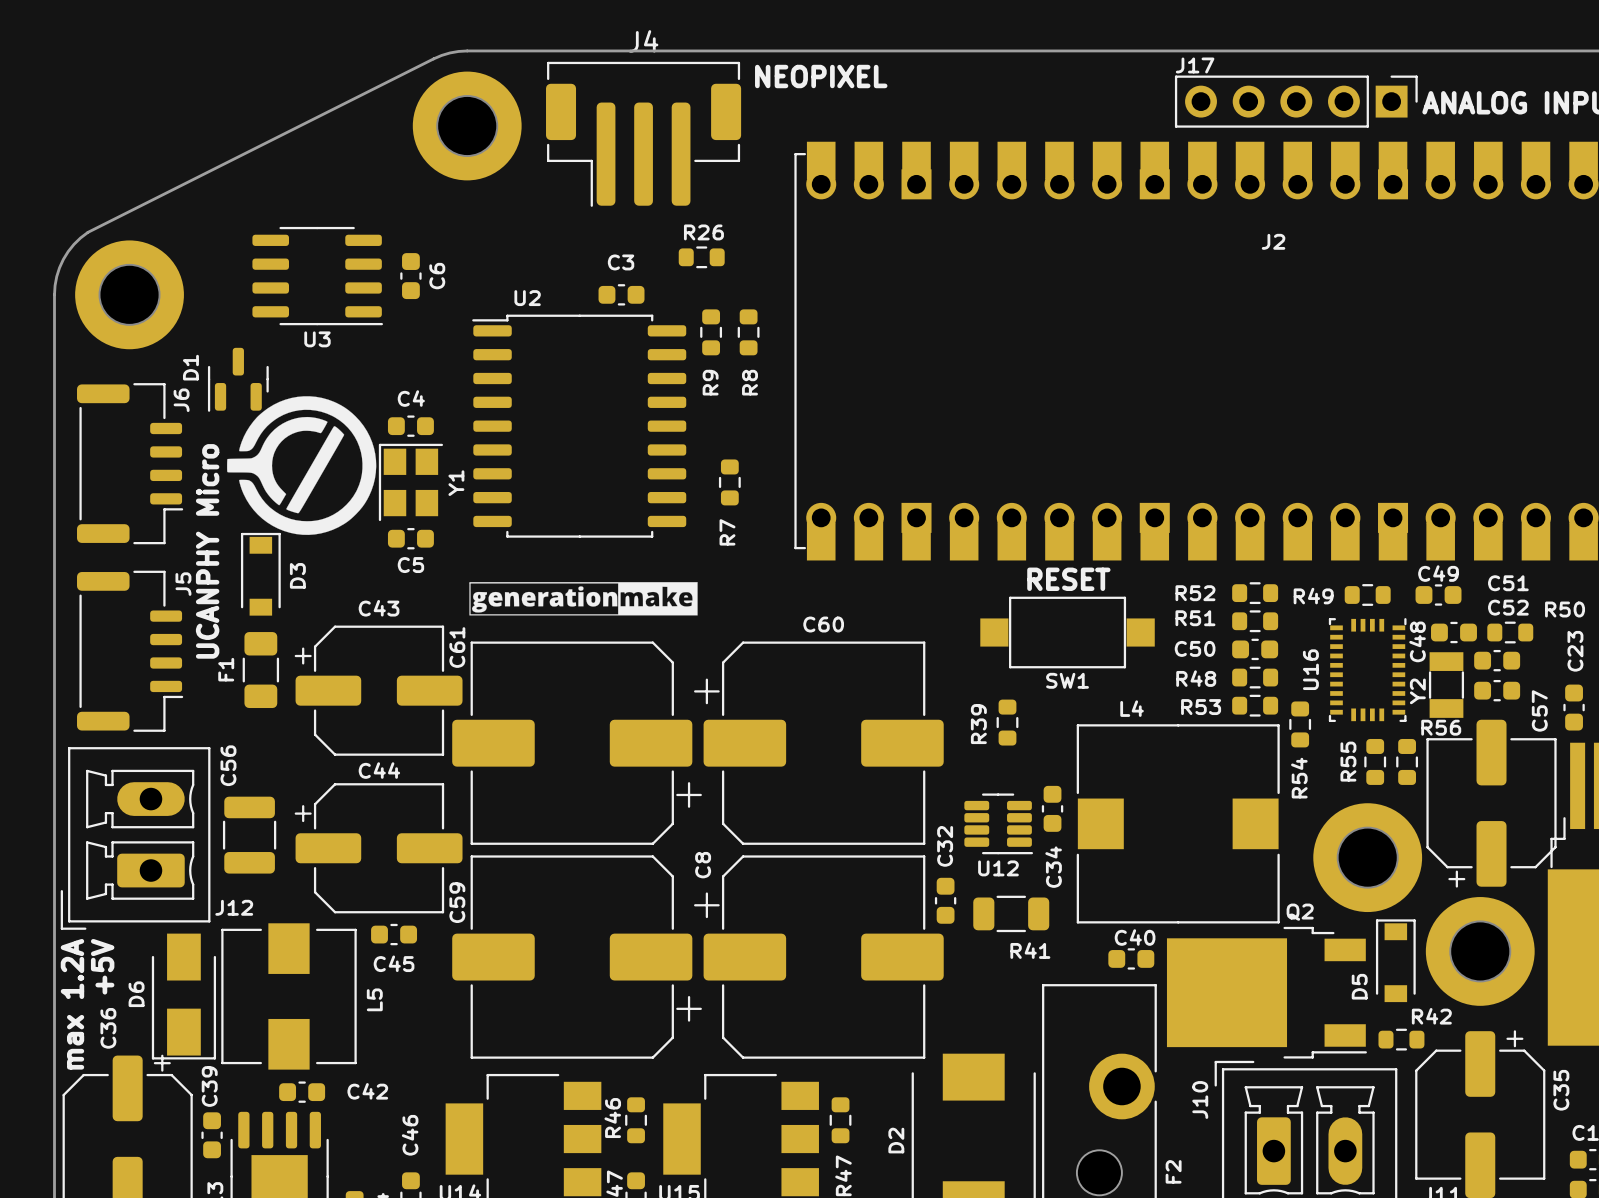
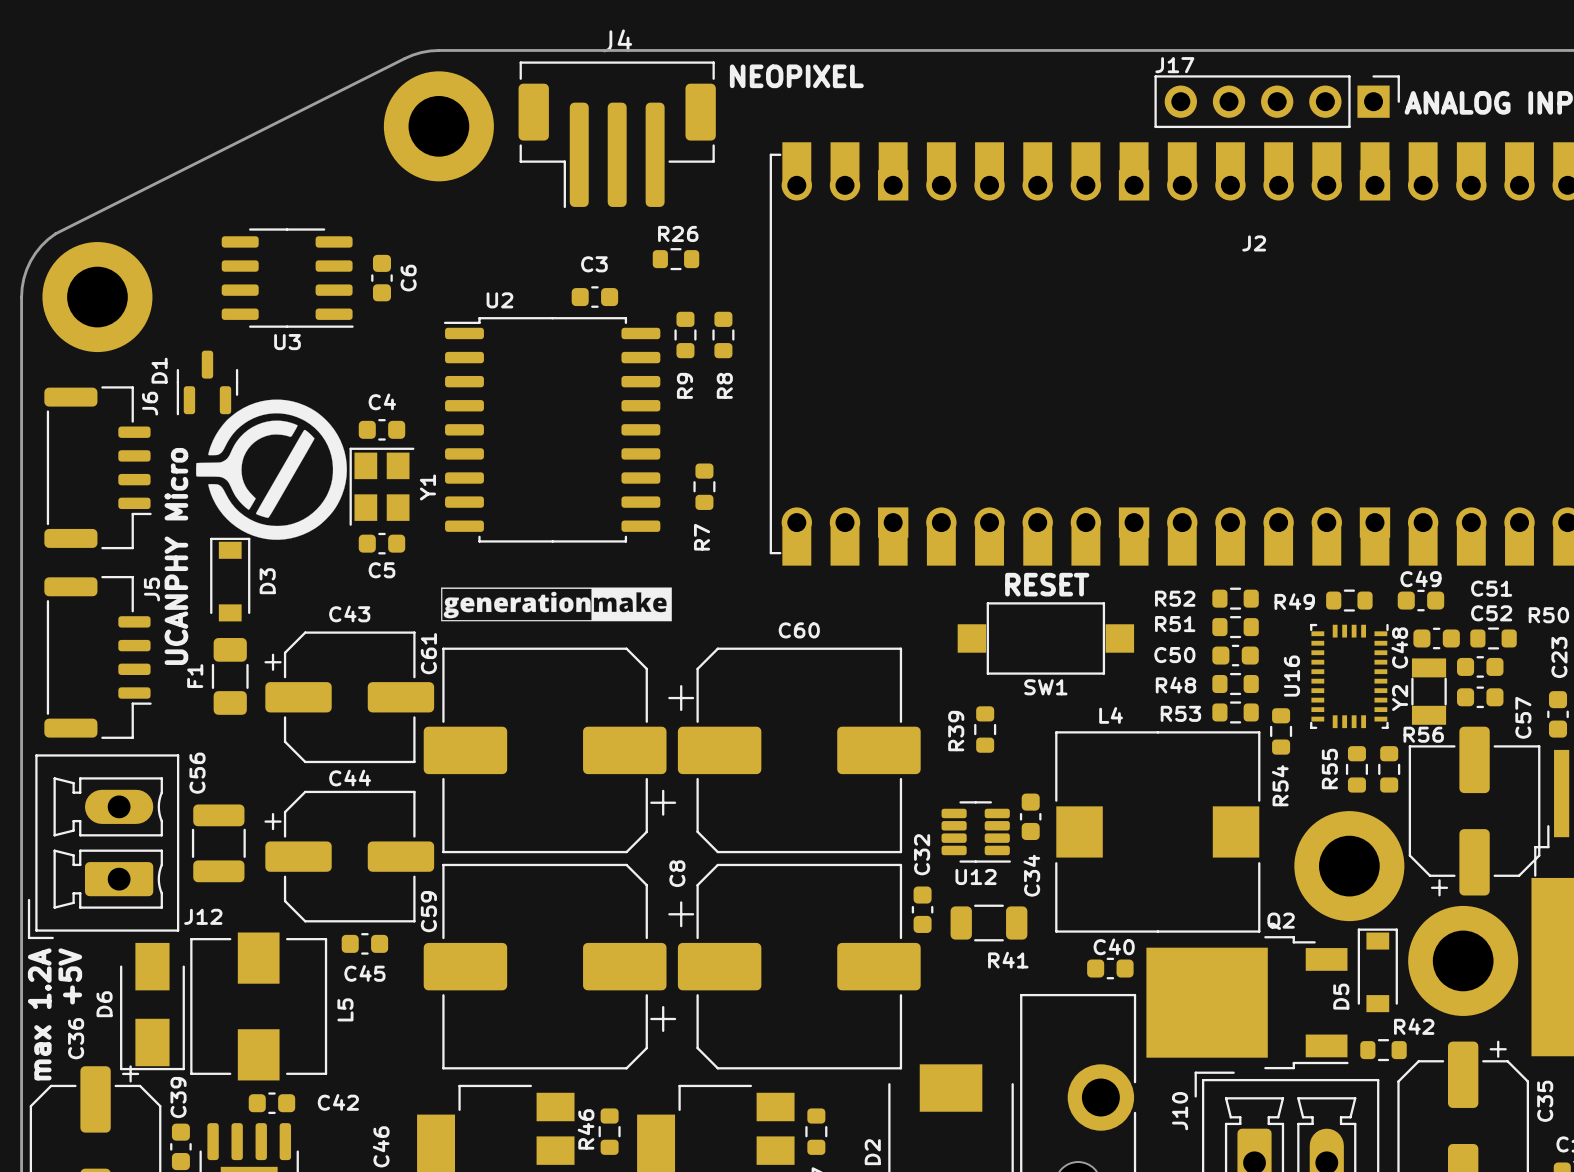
drawing: [436, 95, 499, 157] -> none
drawing: [98, 263, 161, 326] -> none
drawing: [1336, 826, 1399, 889] -> none
drawing: [1449, 920, 1512, 983] -> none

